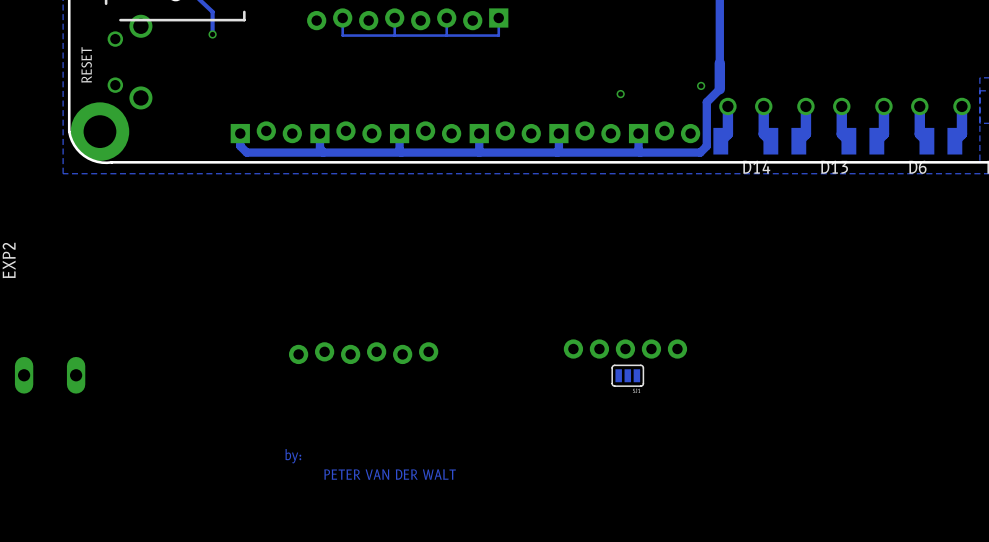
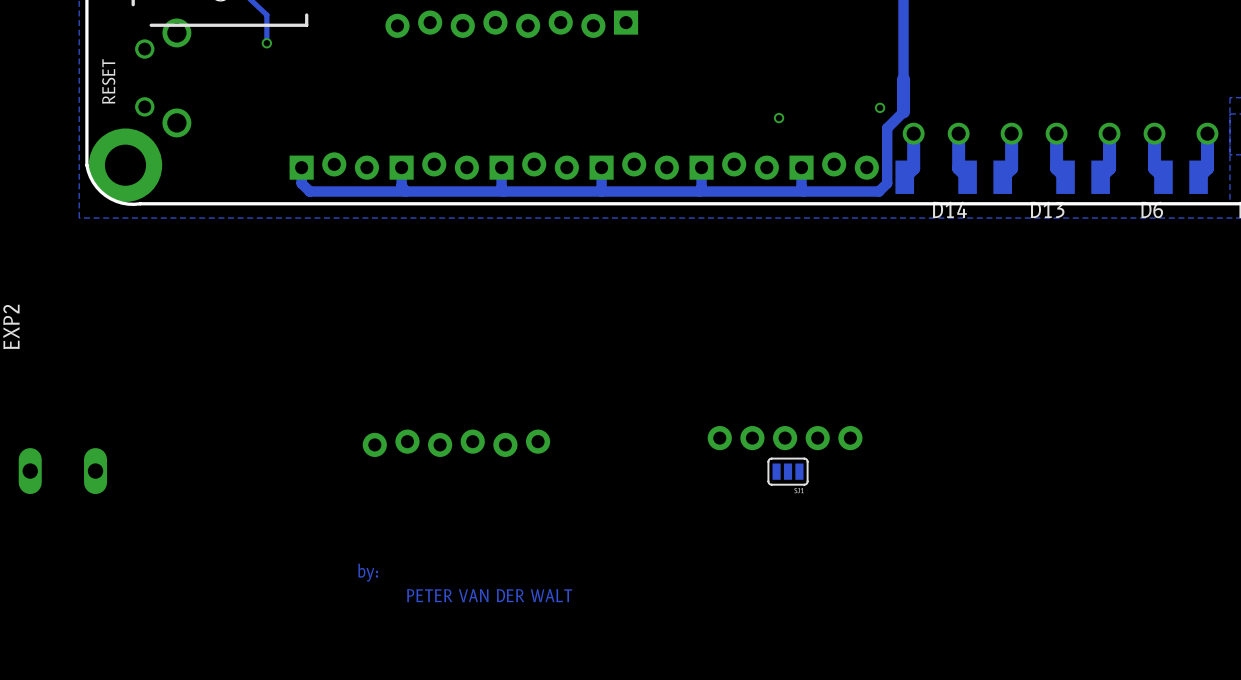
track: (394, 17) (394, 35) -> none
track: (446, 17) (446, 35) -> none
track: (498, 17) (498, 35) (342, 35) (342, 17) -> none

